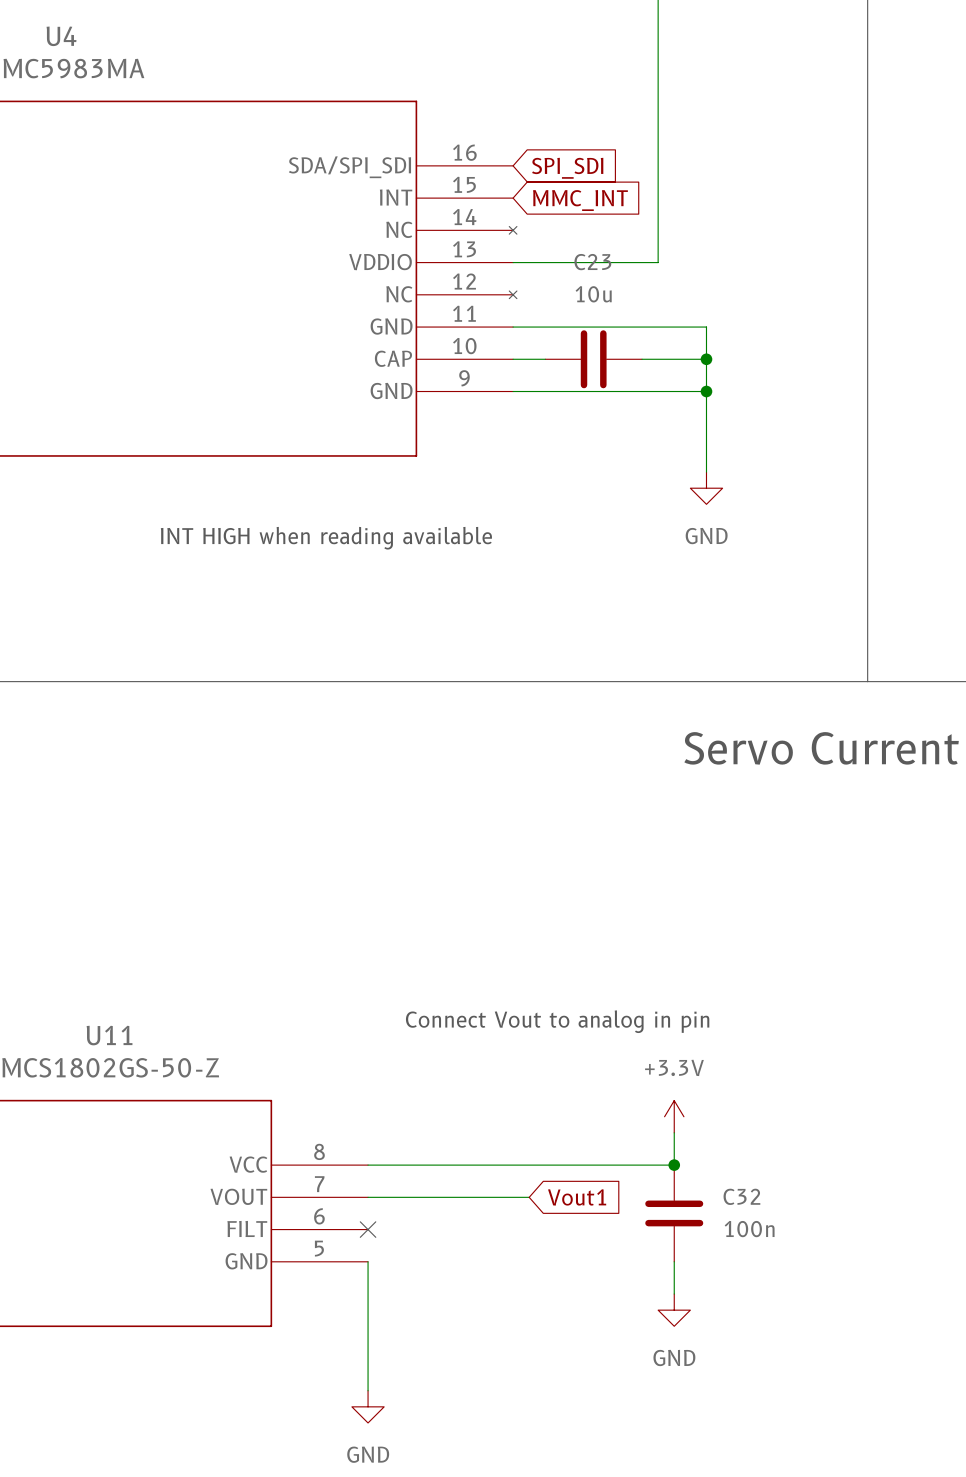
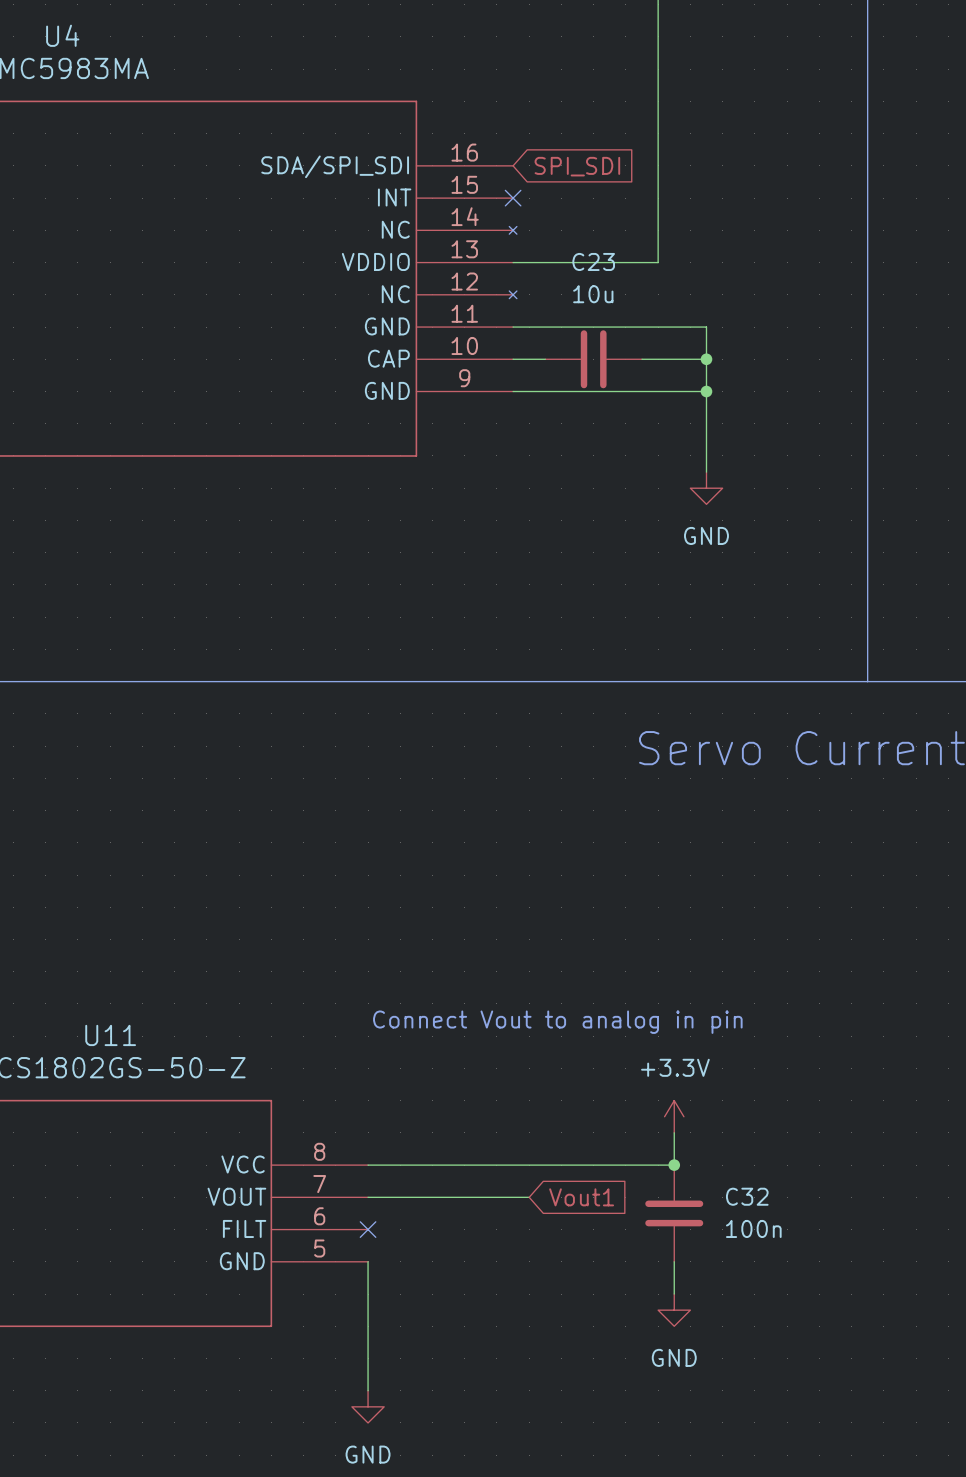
no-connect mark: none -> (513, 198)
global label: MMC_INT (580, 200) -> none
text: INT HIGH when reading available (326, 538) -> none

